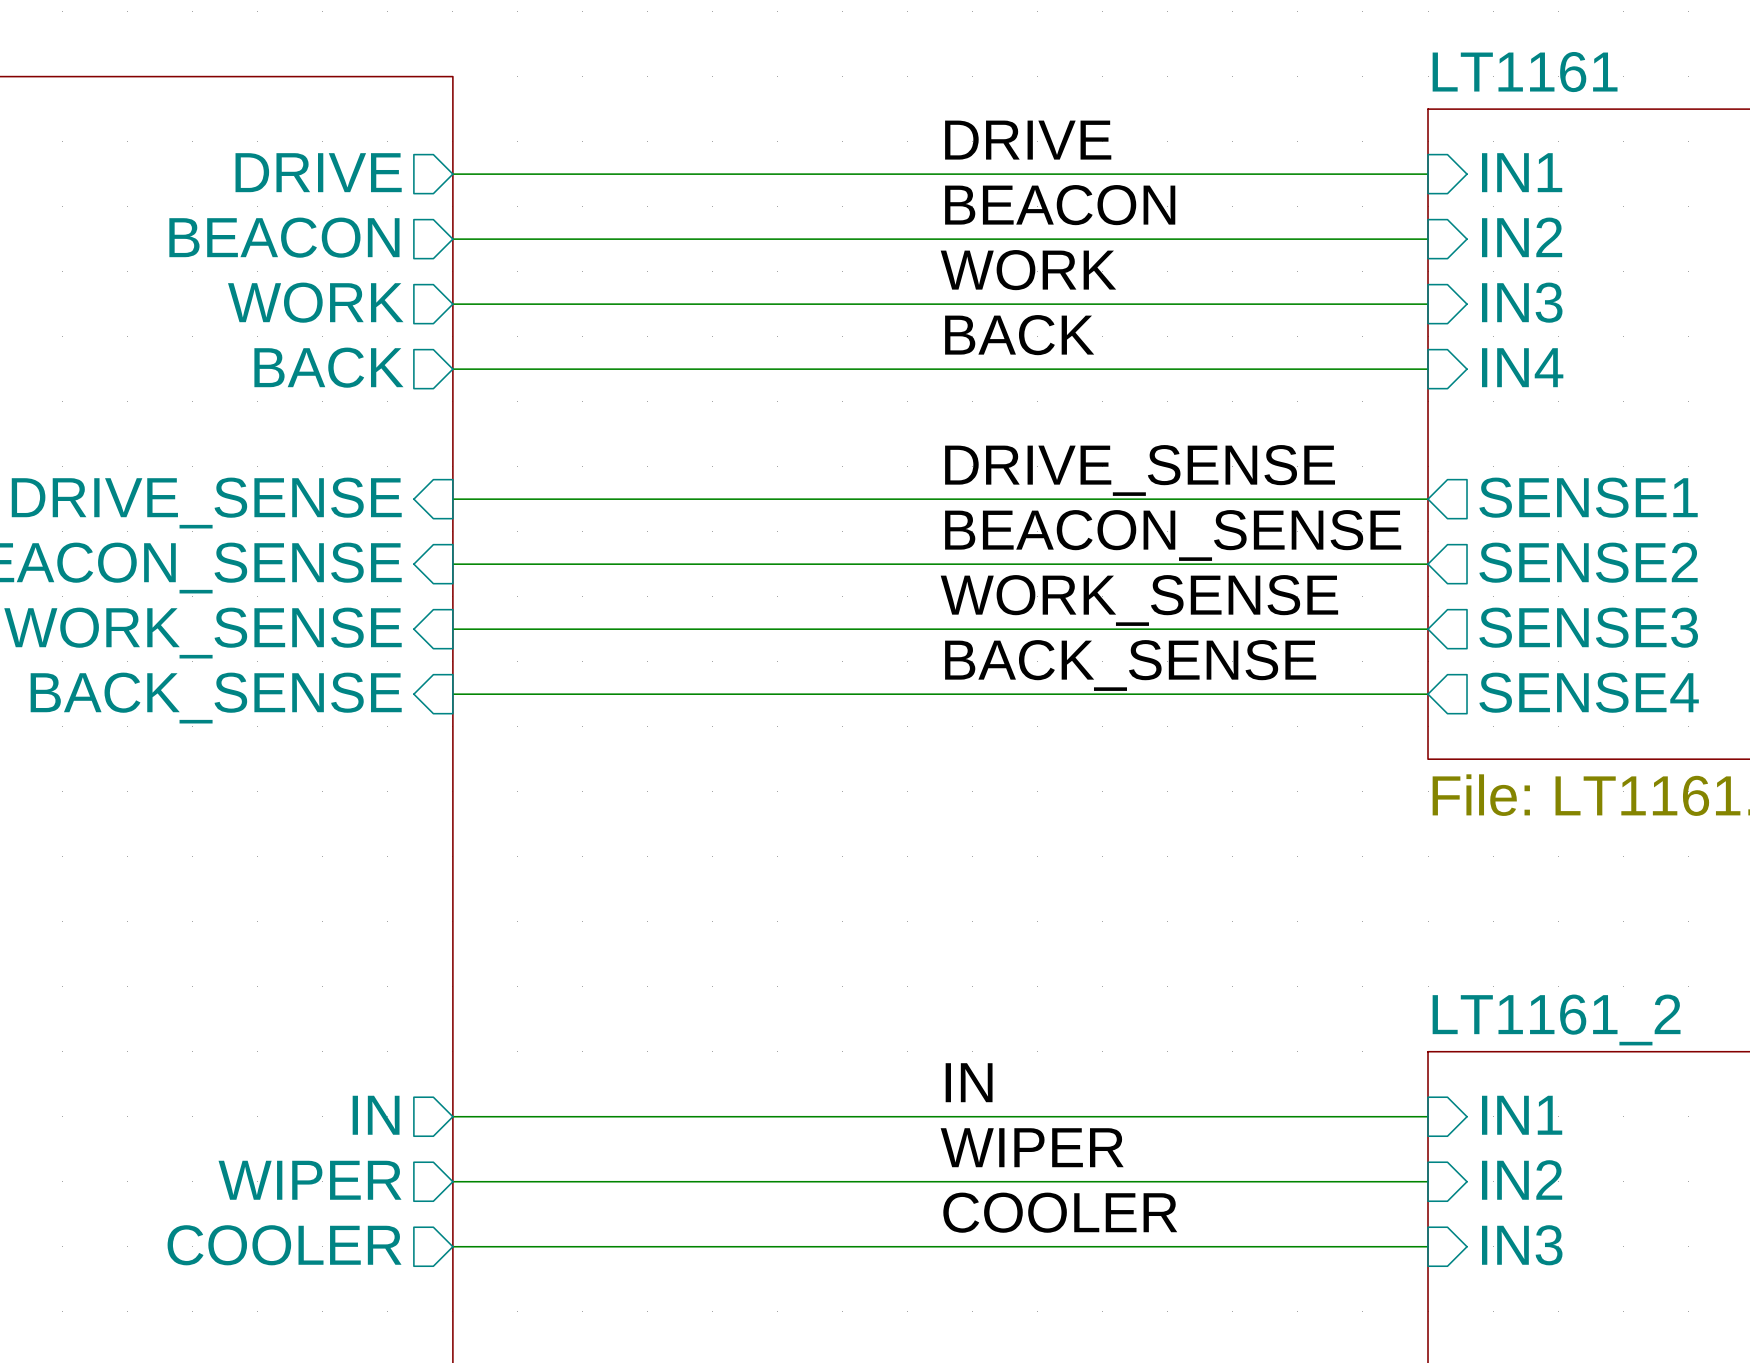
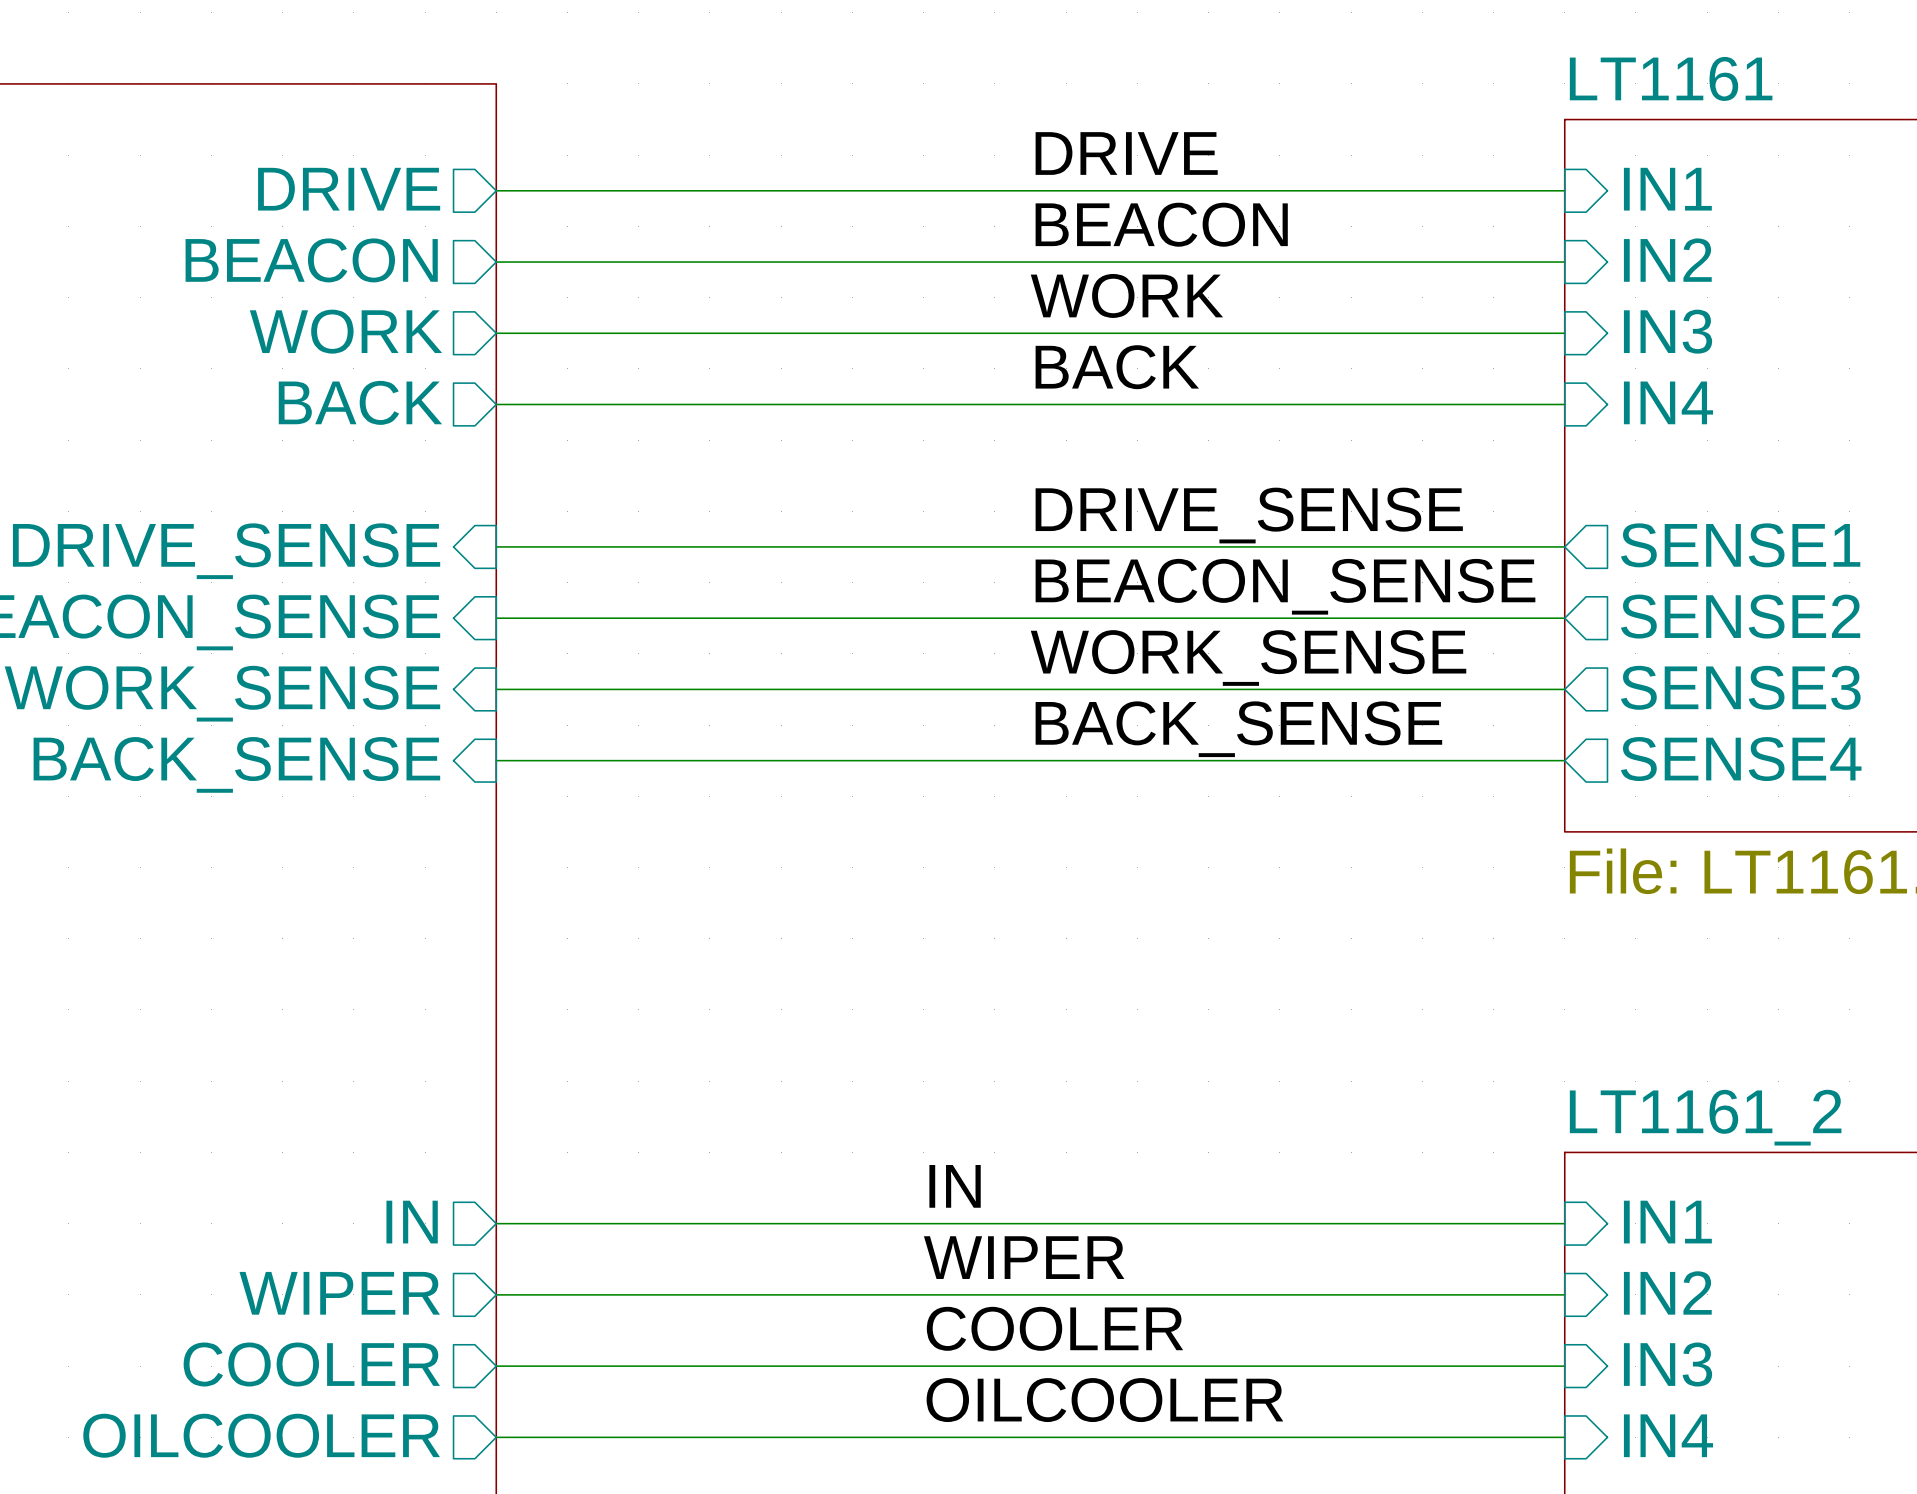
label position: IN (969, 1082) -> IN (955, 1186)
label position: WIPER (1032, 1147) -> WIPER (1024, 1257)
label position: COOLER (1060, 1212) -> COOLER (1054, 1328)
label: none -> OILCOOLER (1104, 1400)
sheet pin: none -> OILCOOLER (261, 1435)
sheet pin: none -> IN4 (1668, 1435)
wire: none -> (496, 1437) (1564, 1437)

